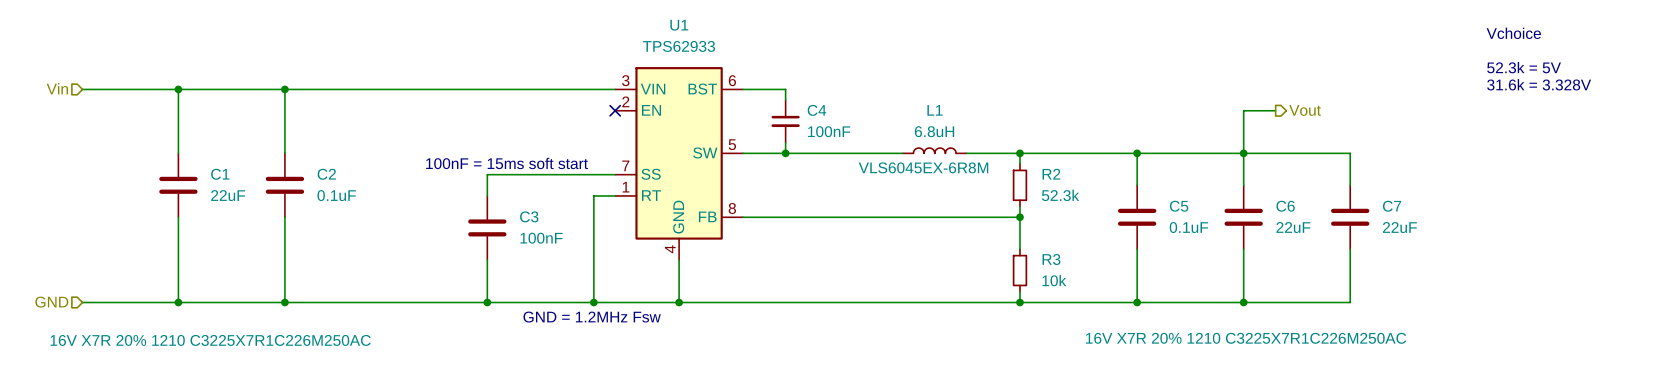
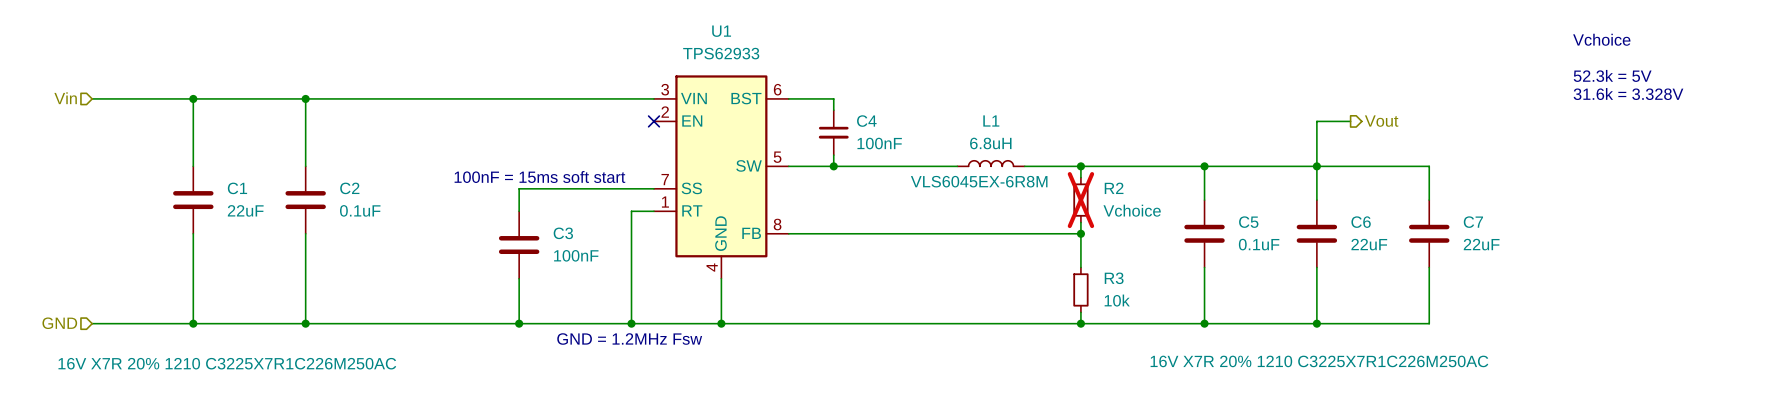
R2 do-not-place cross: none -> (1080, 200)
R2 value: 52.3k (1060, 195) -> Vchoice (1132, 210)

